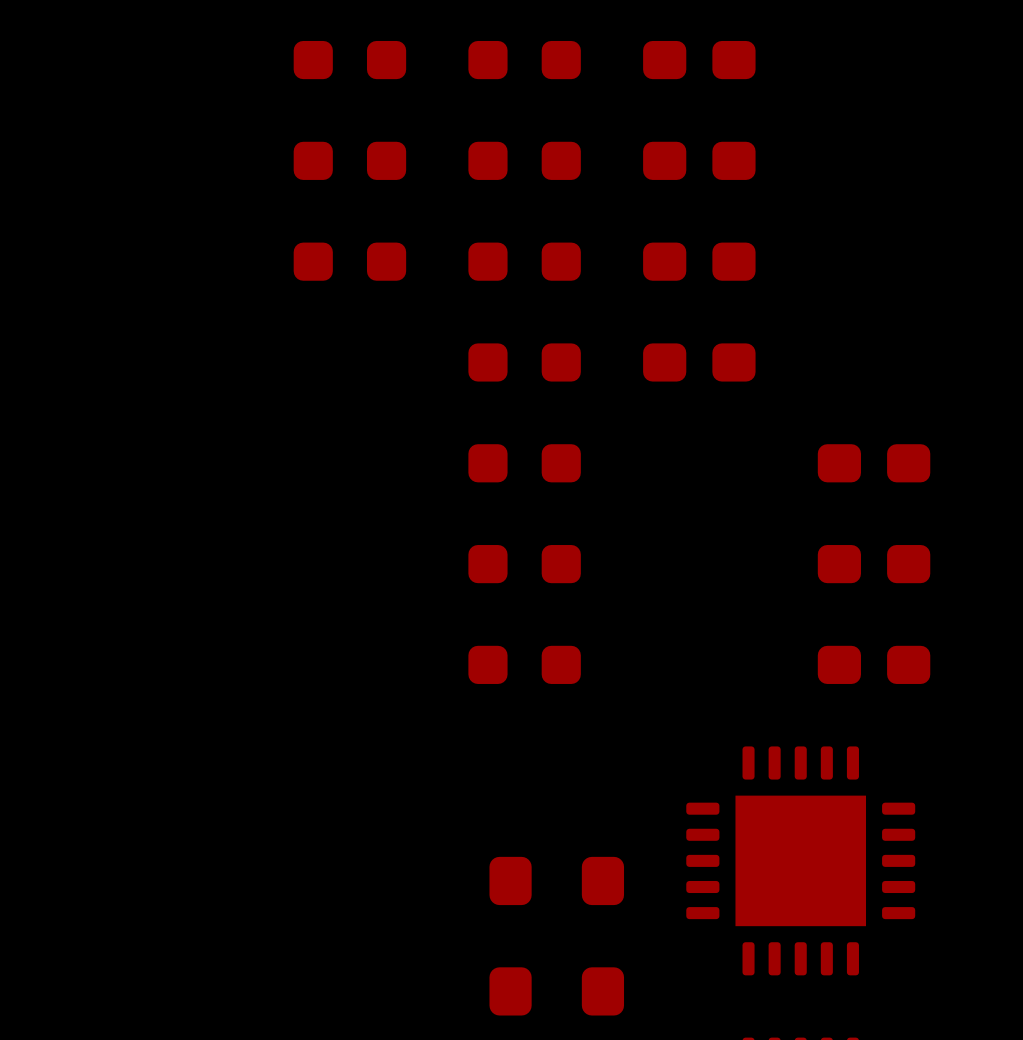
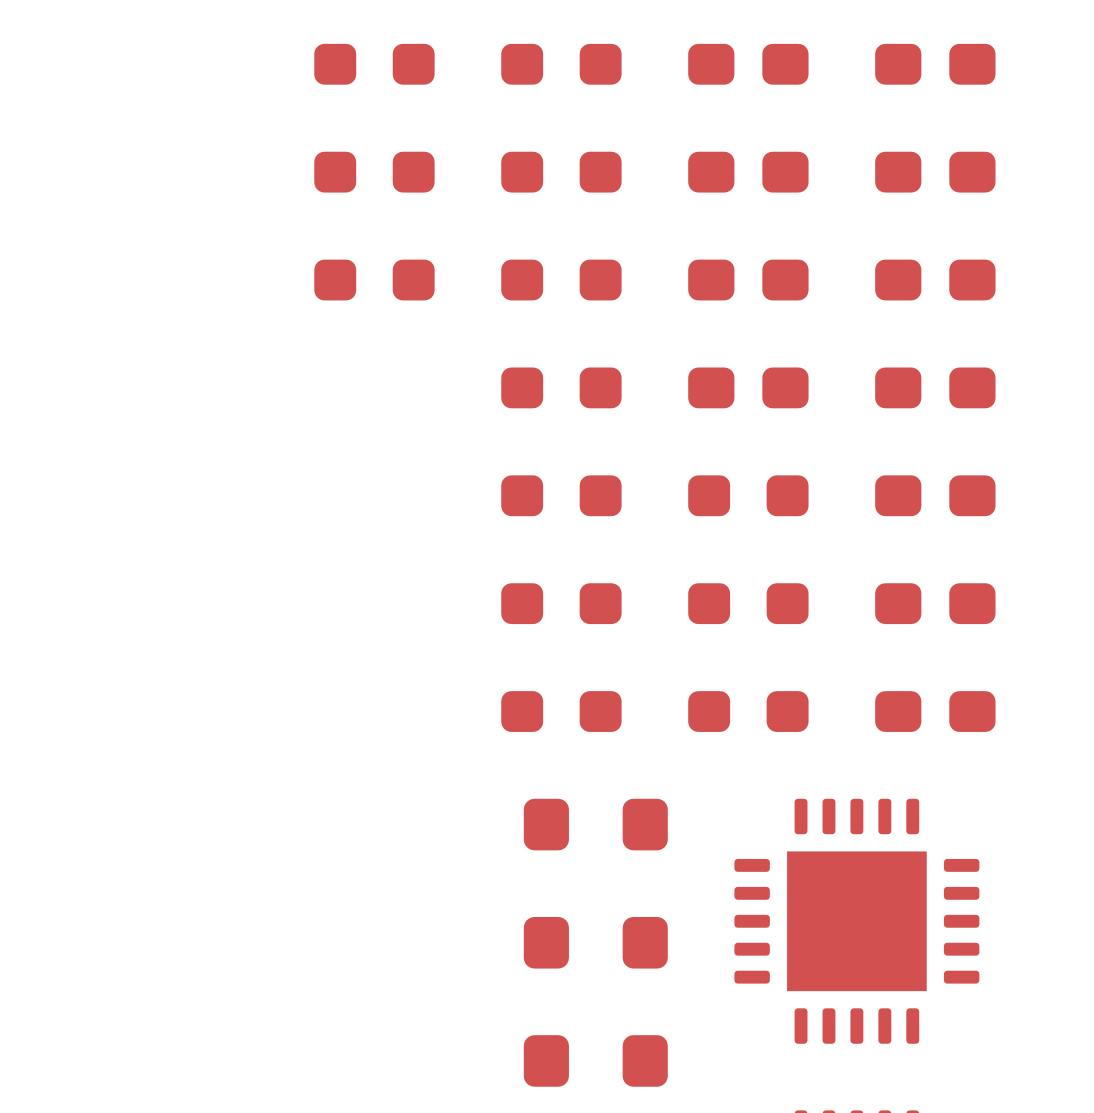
part: none -> (935, 64)
part: none -> (935, 172)
part: none -> (935, 280)
part: none -> (935, 387)
part: none -> (748, 495)
part: none -> (748, 603)
part: none -> (748, 711)
part: none -> (595, 824)

